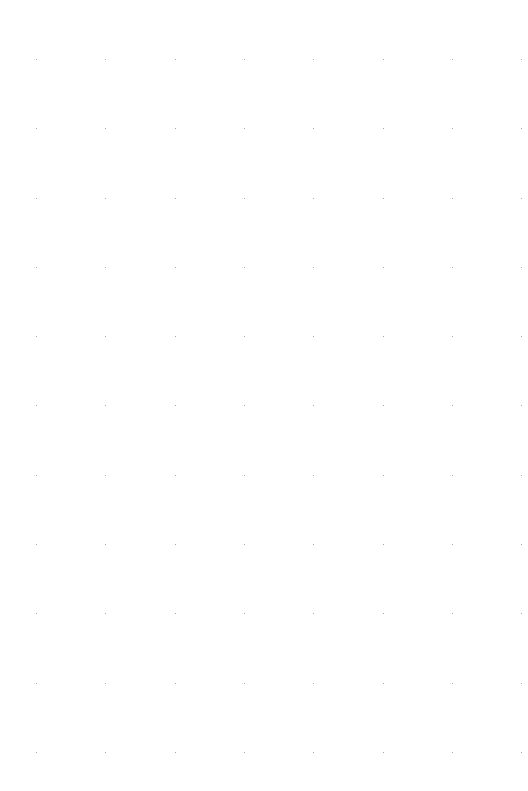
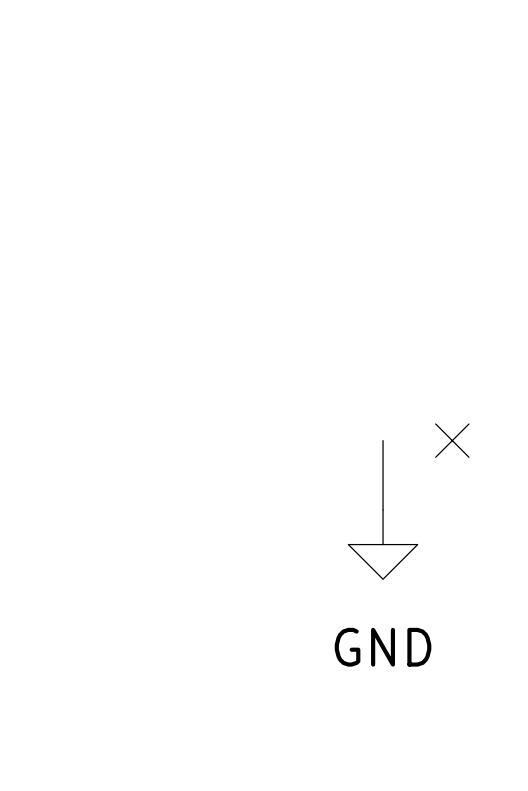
wire: none -> (383, 440) (383, 509)
no-connect mark: none -> (452, 440)
power symbol: none -> GND (383, 544)

